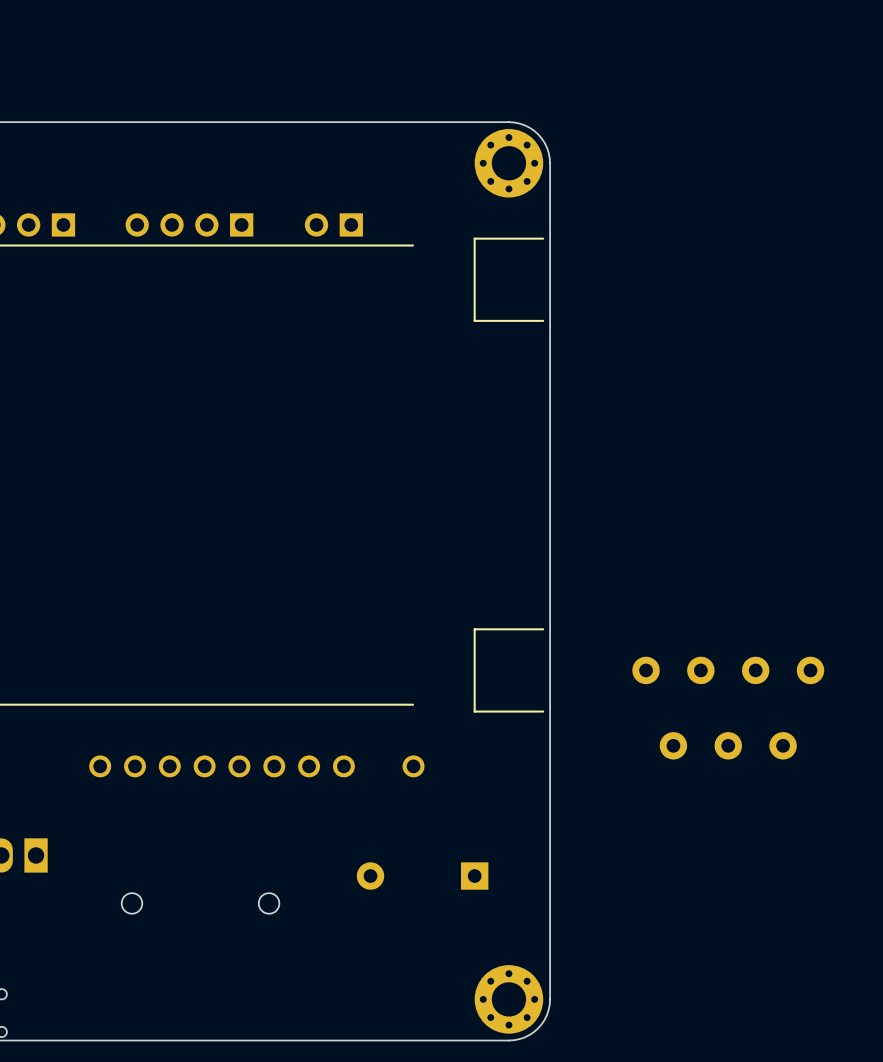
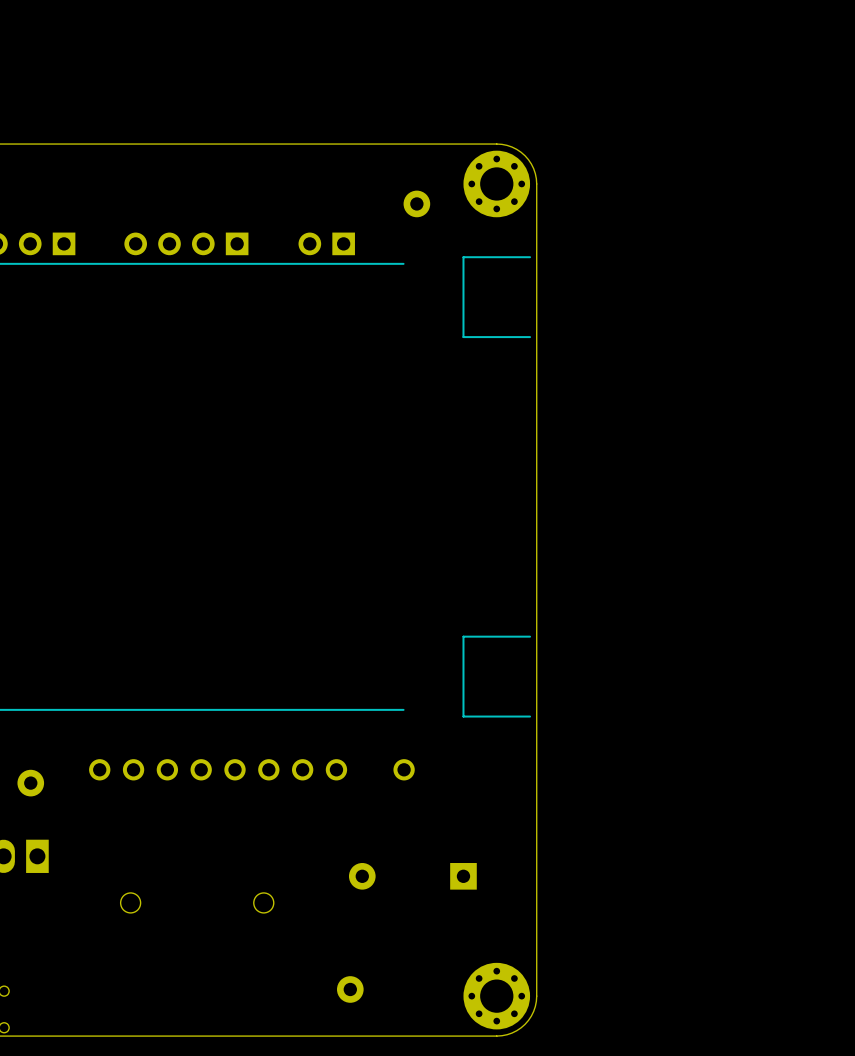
part: none -> (416, 203)
part: (646, 670) -> none
part: (700, 670) -> none
part: (755, 670) -> none
part: (810, 670) -> none
part: (673, 745) -> none
part: (728, 745) -> none
part: (783, 745) -> none
part: none -> (30, 783)
part: none -> (350, 989)

